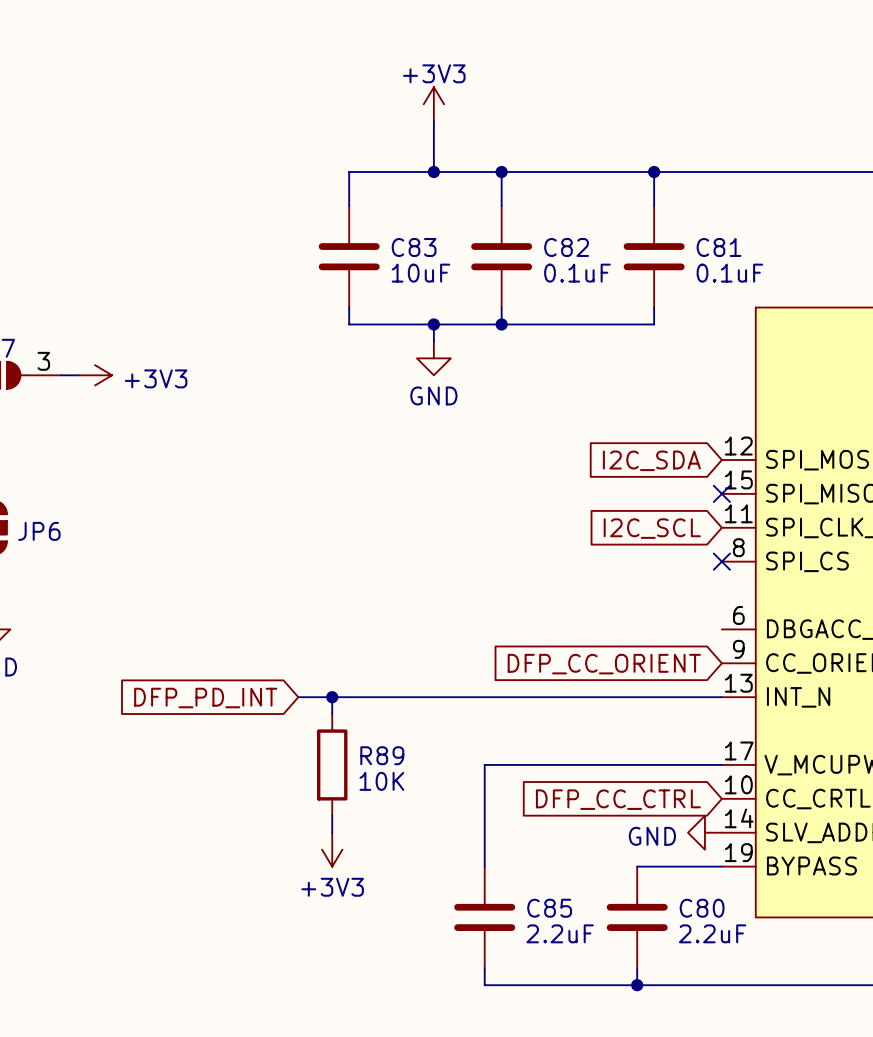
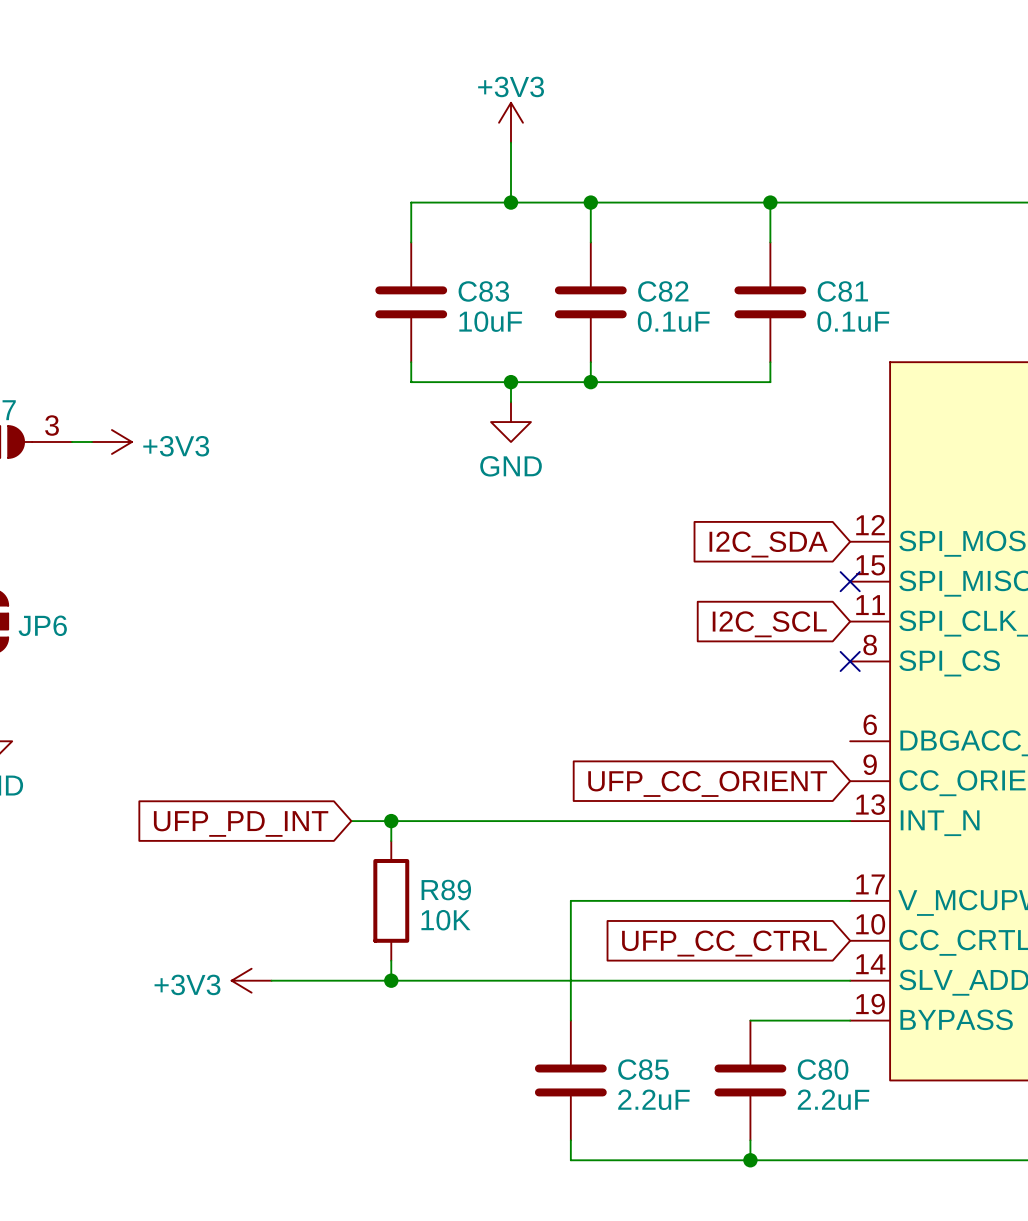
global label: DFP_CC_ORIENT (604, 664) -> UFP_CC_ORIENT (707, 783)
global label: DFP_PD_INT (205, 698) -> UFP_PD_INT (241, 823)
global label: DFP_CC_CTRL (618, 799) -> UFP_CC_CTRL (724, 943)
wire: none -> (271, 980) (850, 980)
junction: none -> (391, 980)
power symbol: GND (704, 832) -> none
power symbol rotation: 0° (332, 849) -> 90° clockwise (251, 980)
power symbol position: +3V3 (332, 849) -> +3V3 (251, 980)
power symbol text position: +3V3 (332, 887) -> +3V3 (187, 984)

